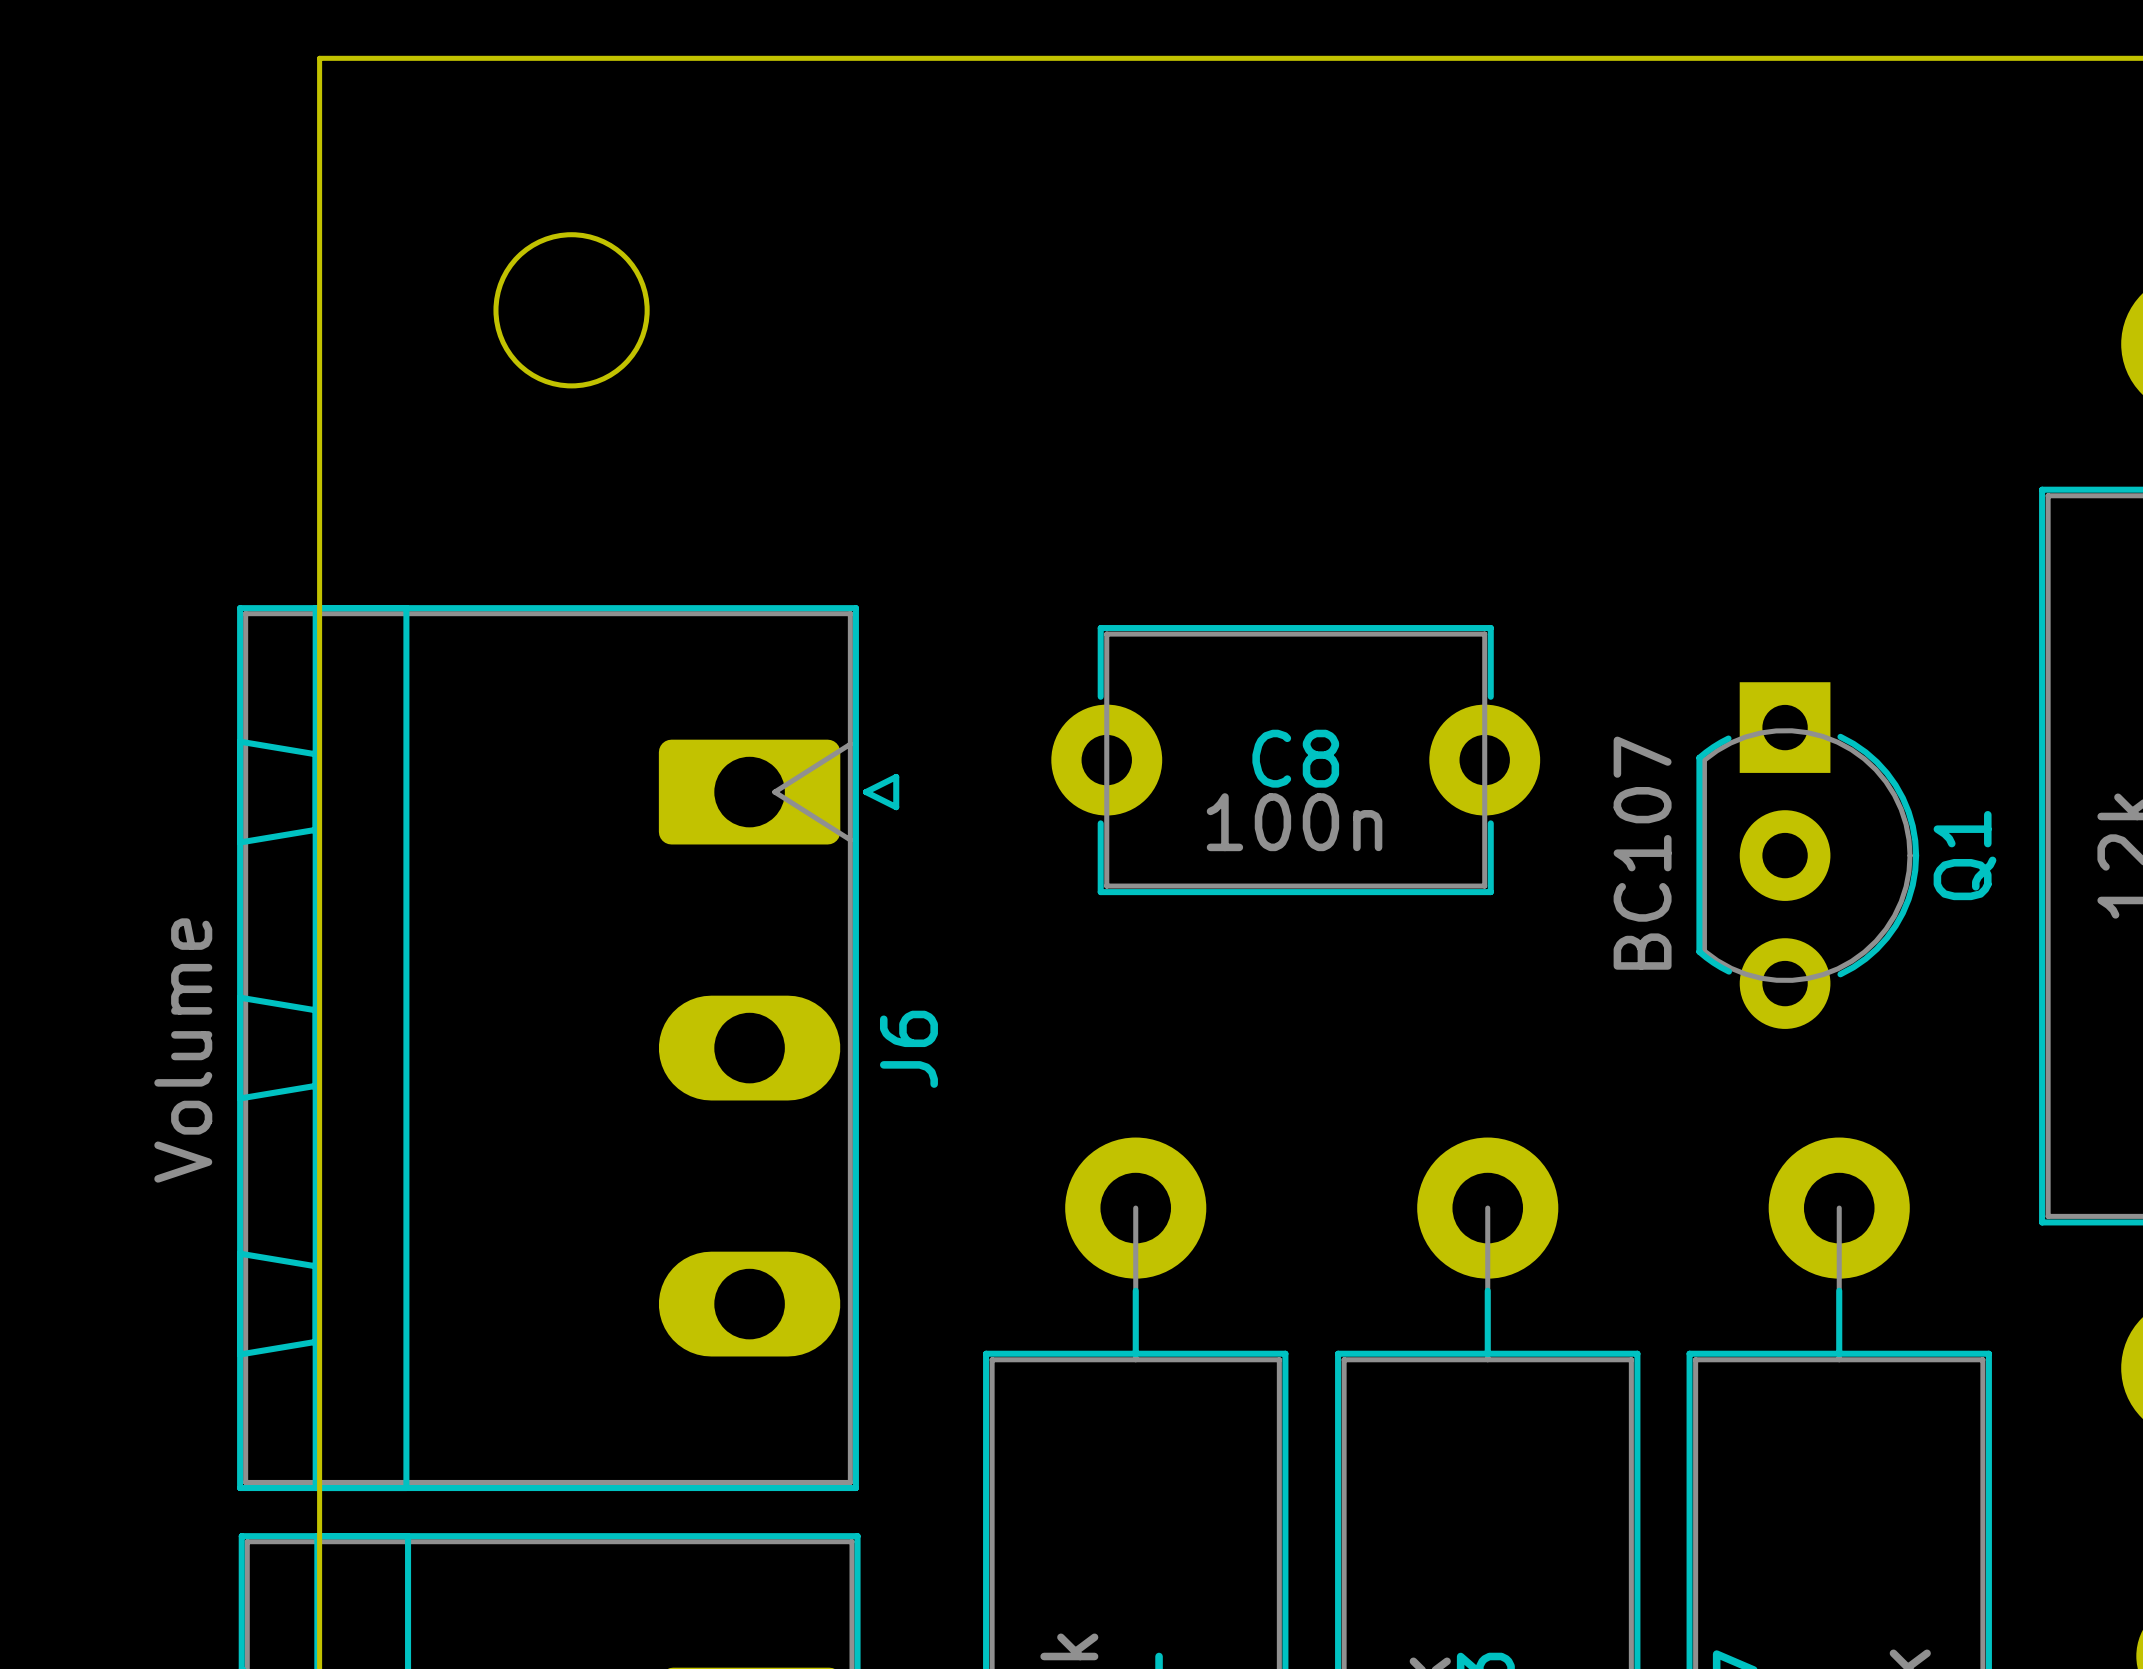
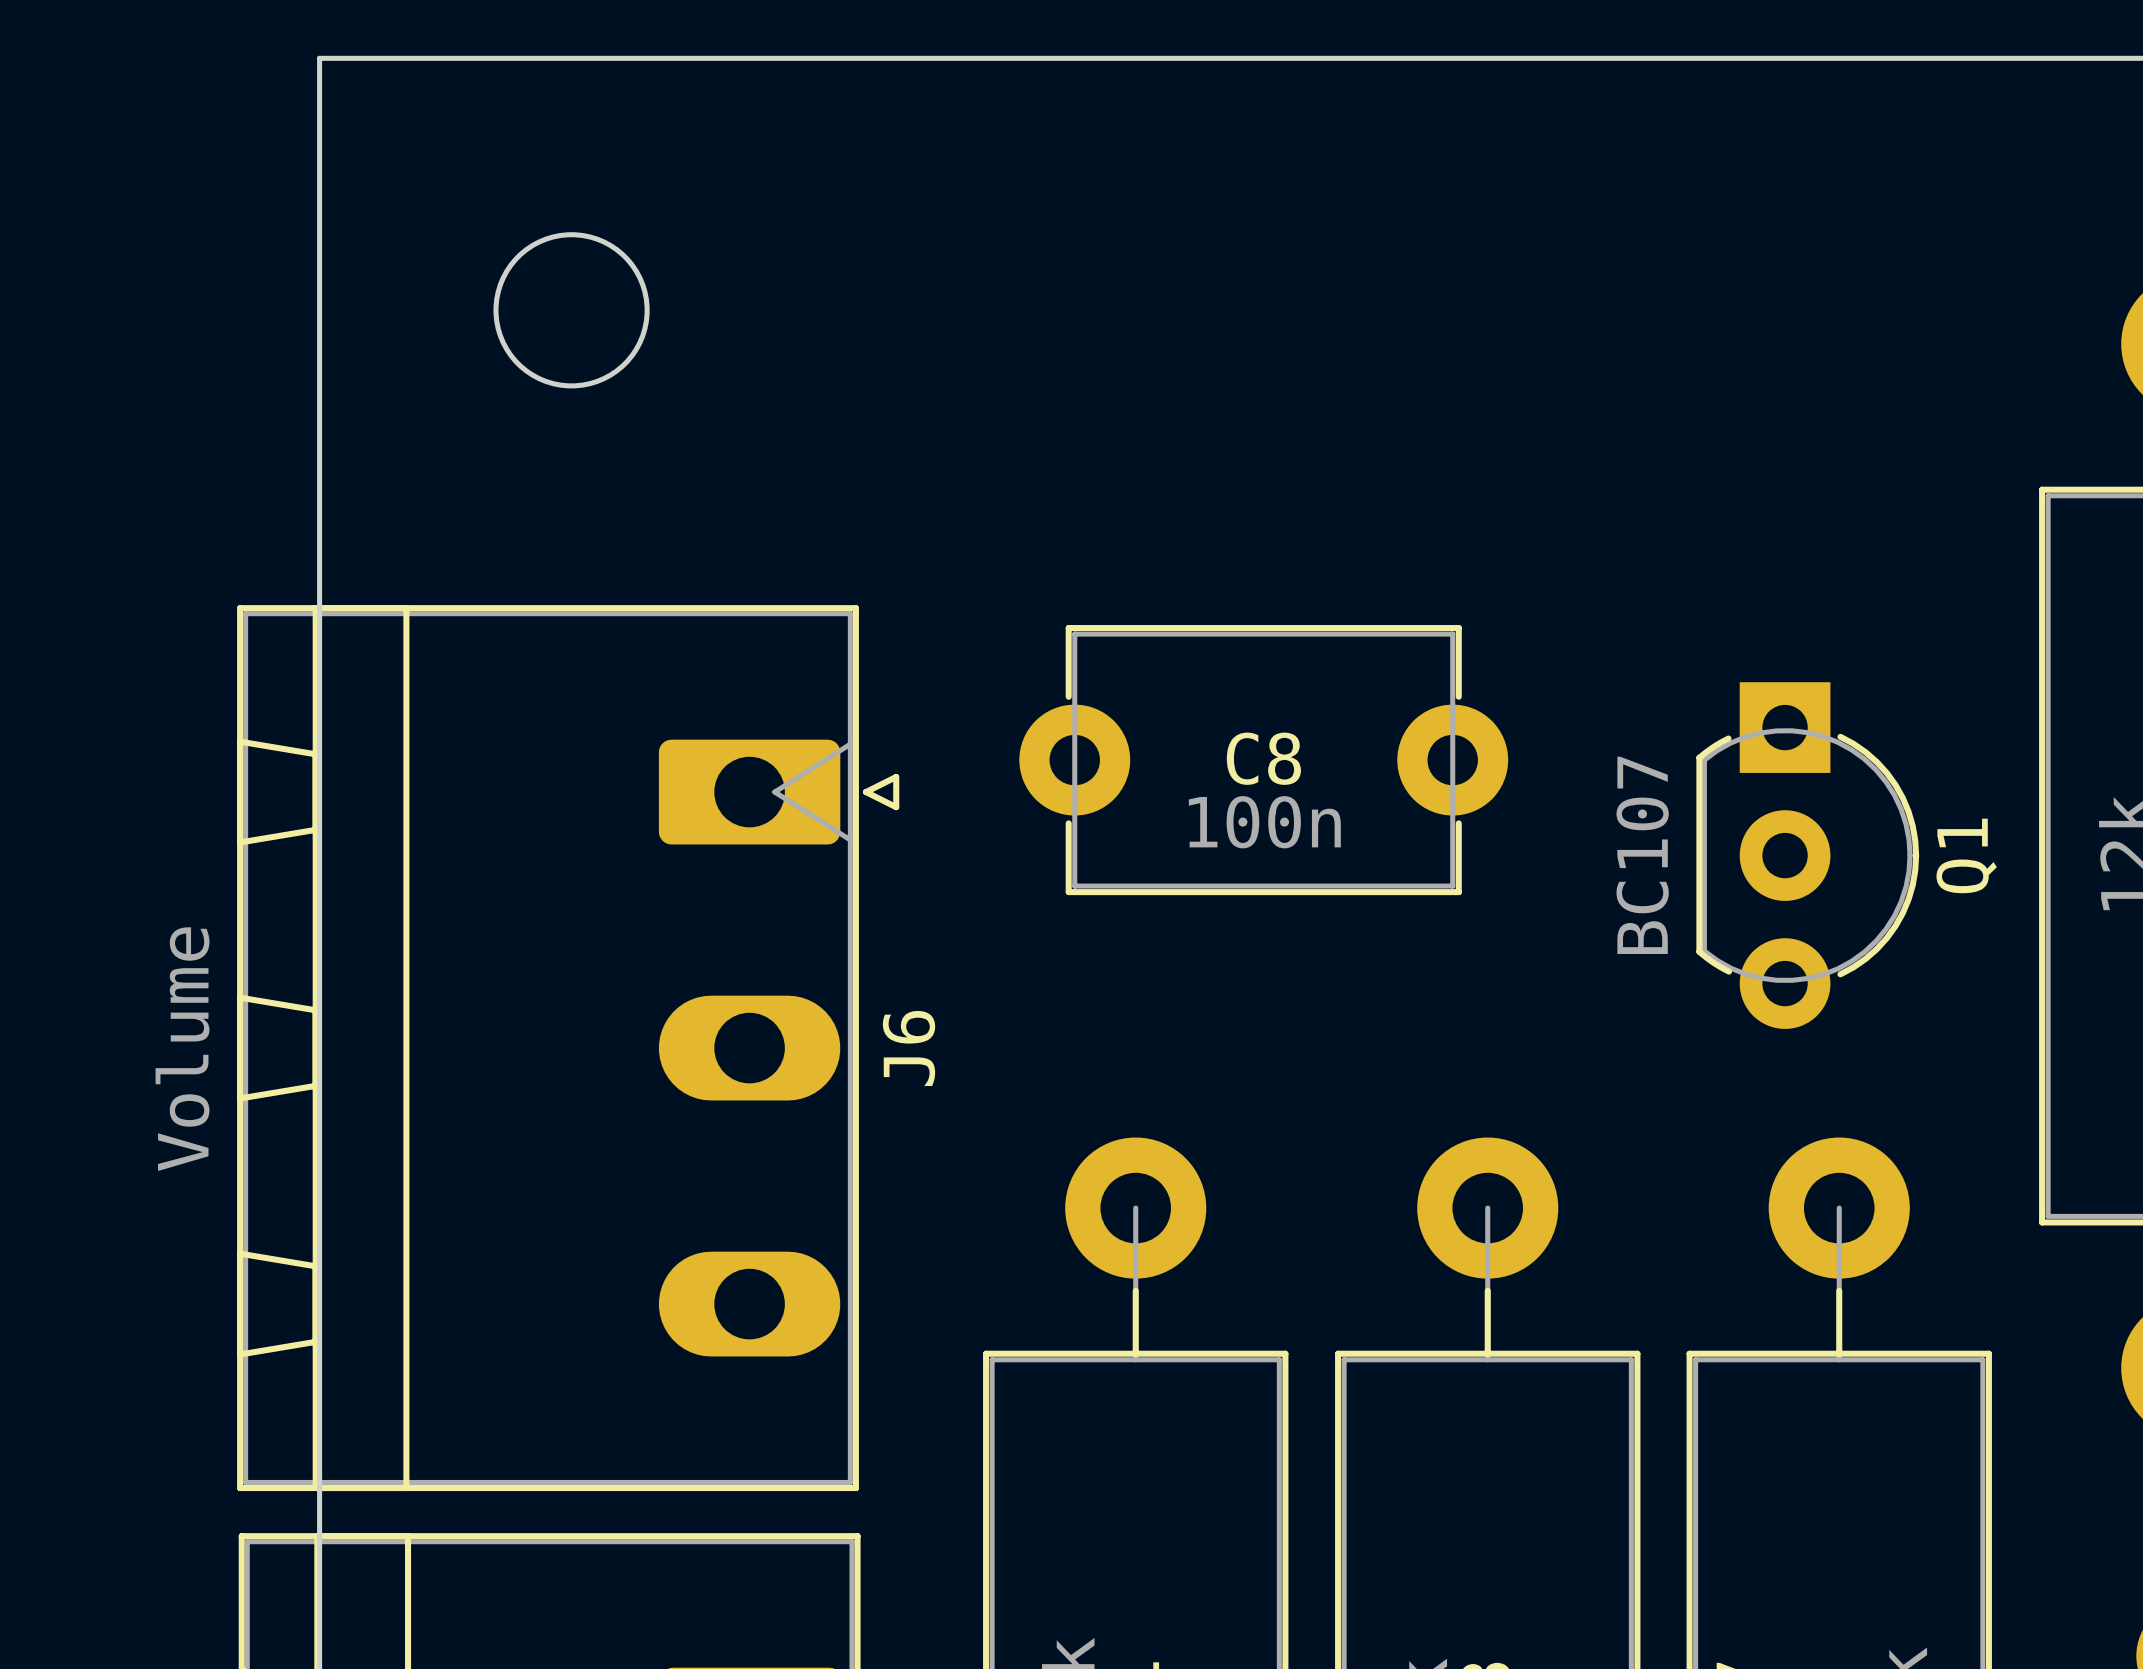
C8 position: (1295, 760) -> (1263, 760)

